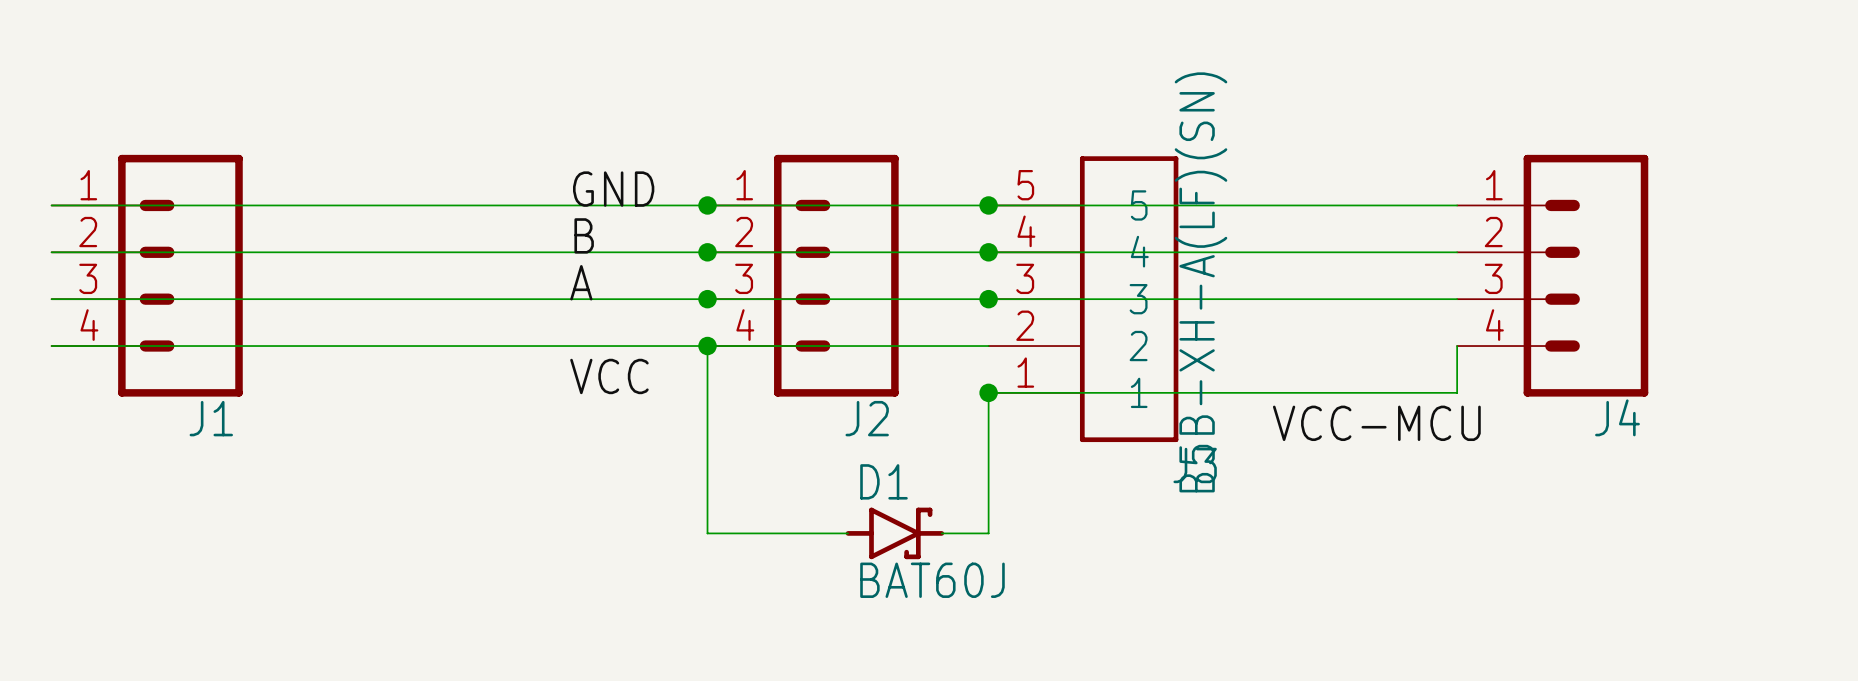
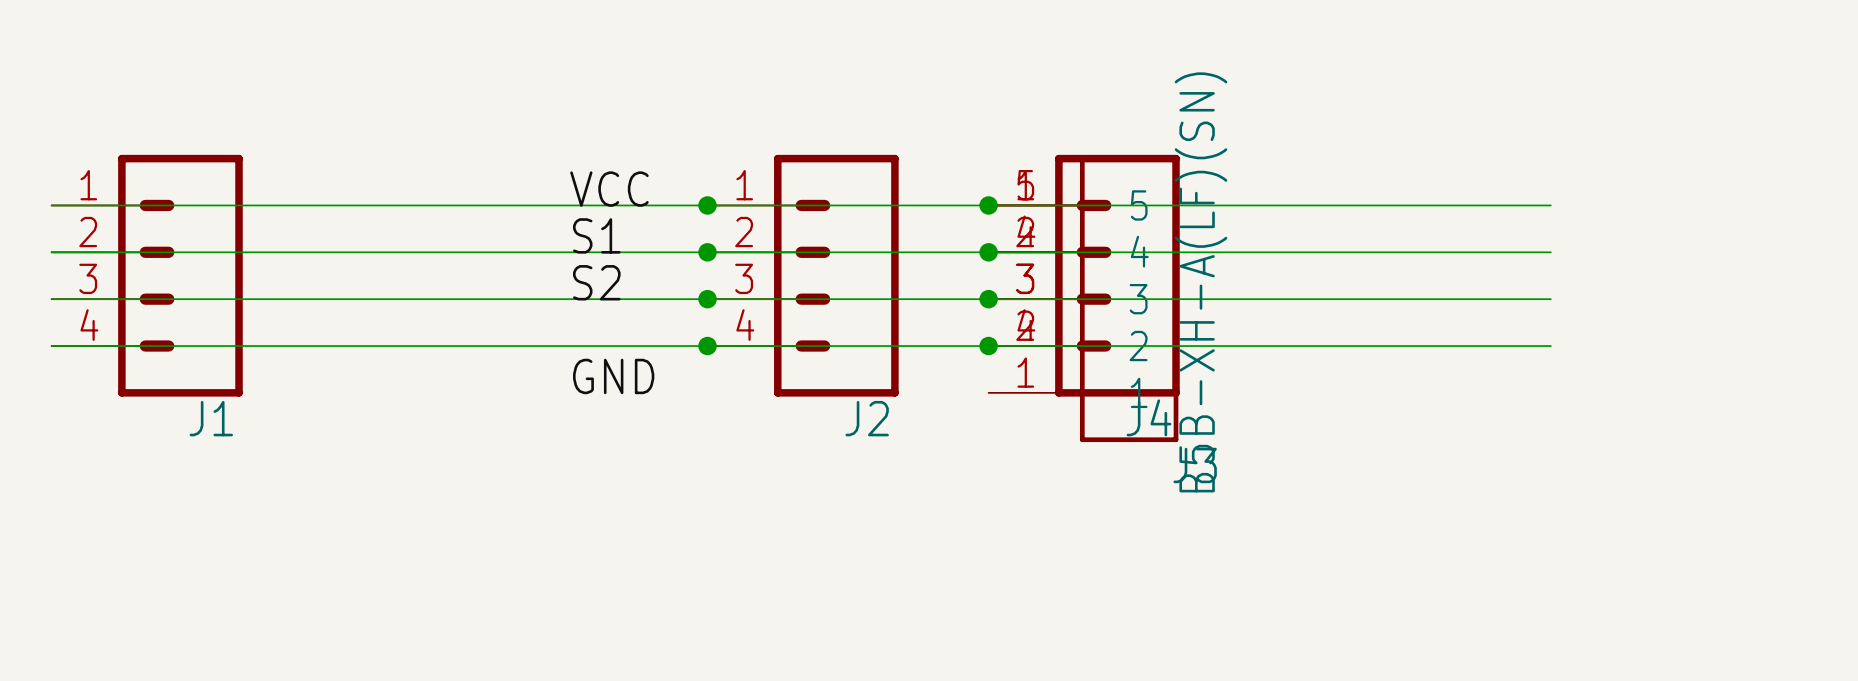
label: GND (613, 189) -> VCC (609, 189)
label: B (584, 235) -> S1 (596, 235)
J4 position: (1552, 275) -> (1084, 275)
label: A (581, 282) -> S2 (596, 282)
wire: (707, 346) (707, 533) (848, 533) -> none
wire: none -> (988, 346) (1550, 346)
wire: (1457, 346) (1457, 392) (988, 392) (988, 533) (941, 533) -> none
label: VCC (609, 376) -> GND (613, 376)
junction position: (988, 392) -> (988, 346)
label: VCC-MCU (1376, 423) -> none
D1: BAT60J (894, 533) -> none

